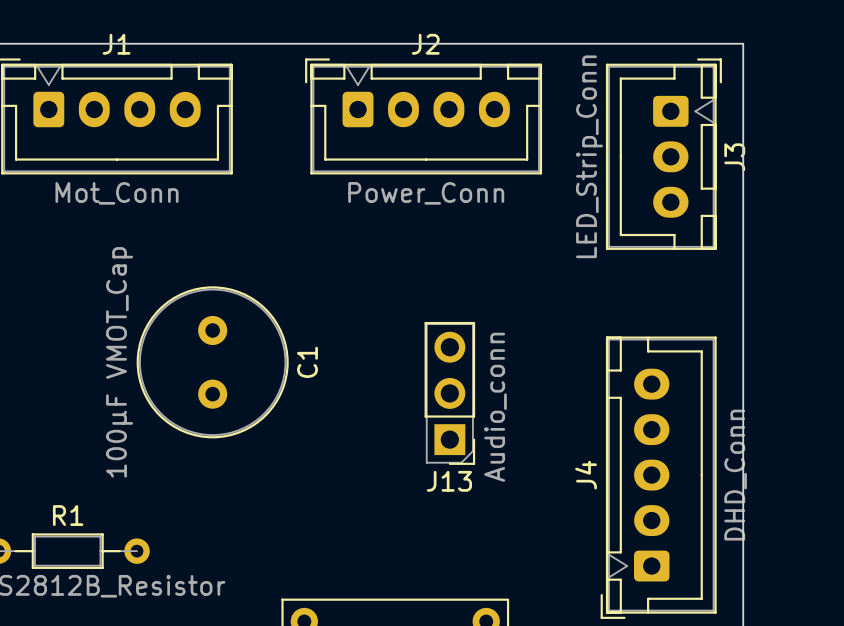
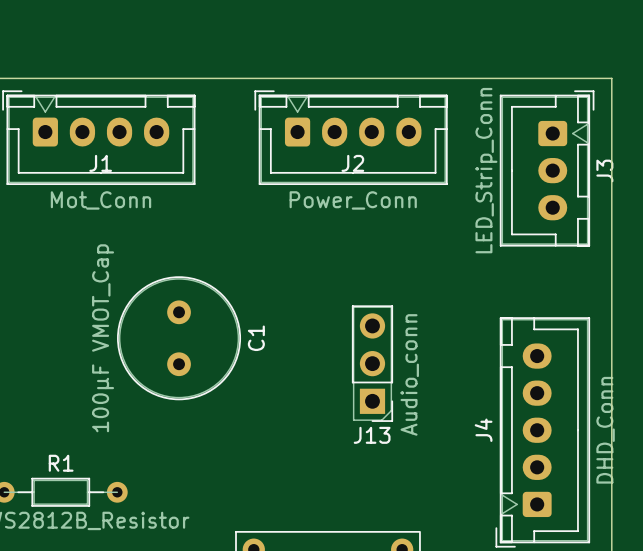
J1 name position: J1 (116, 44) -> J1 (100, 163)
J2 name position: J2 (425, 44) -> J2 (352, 163)

